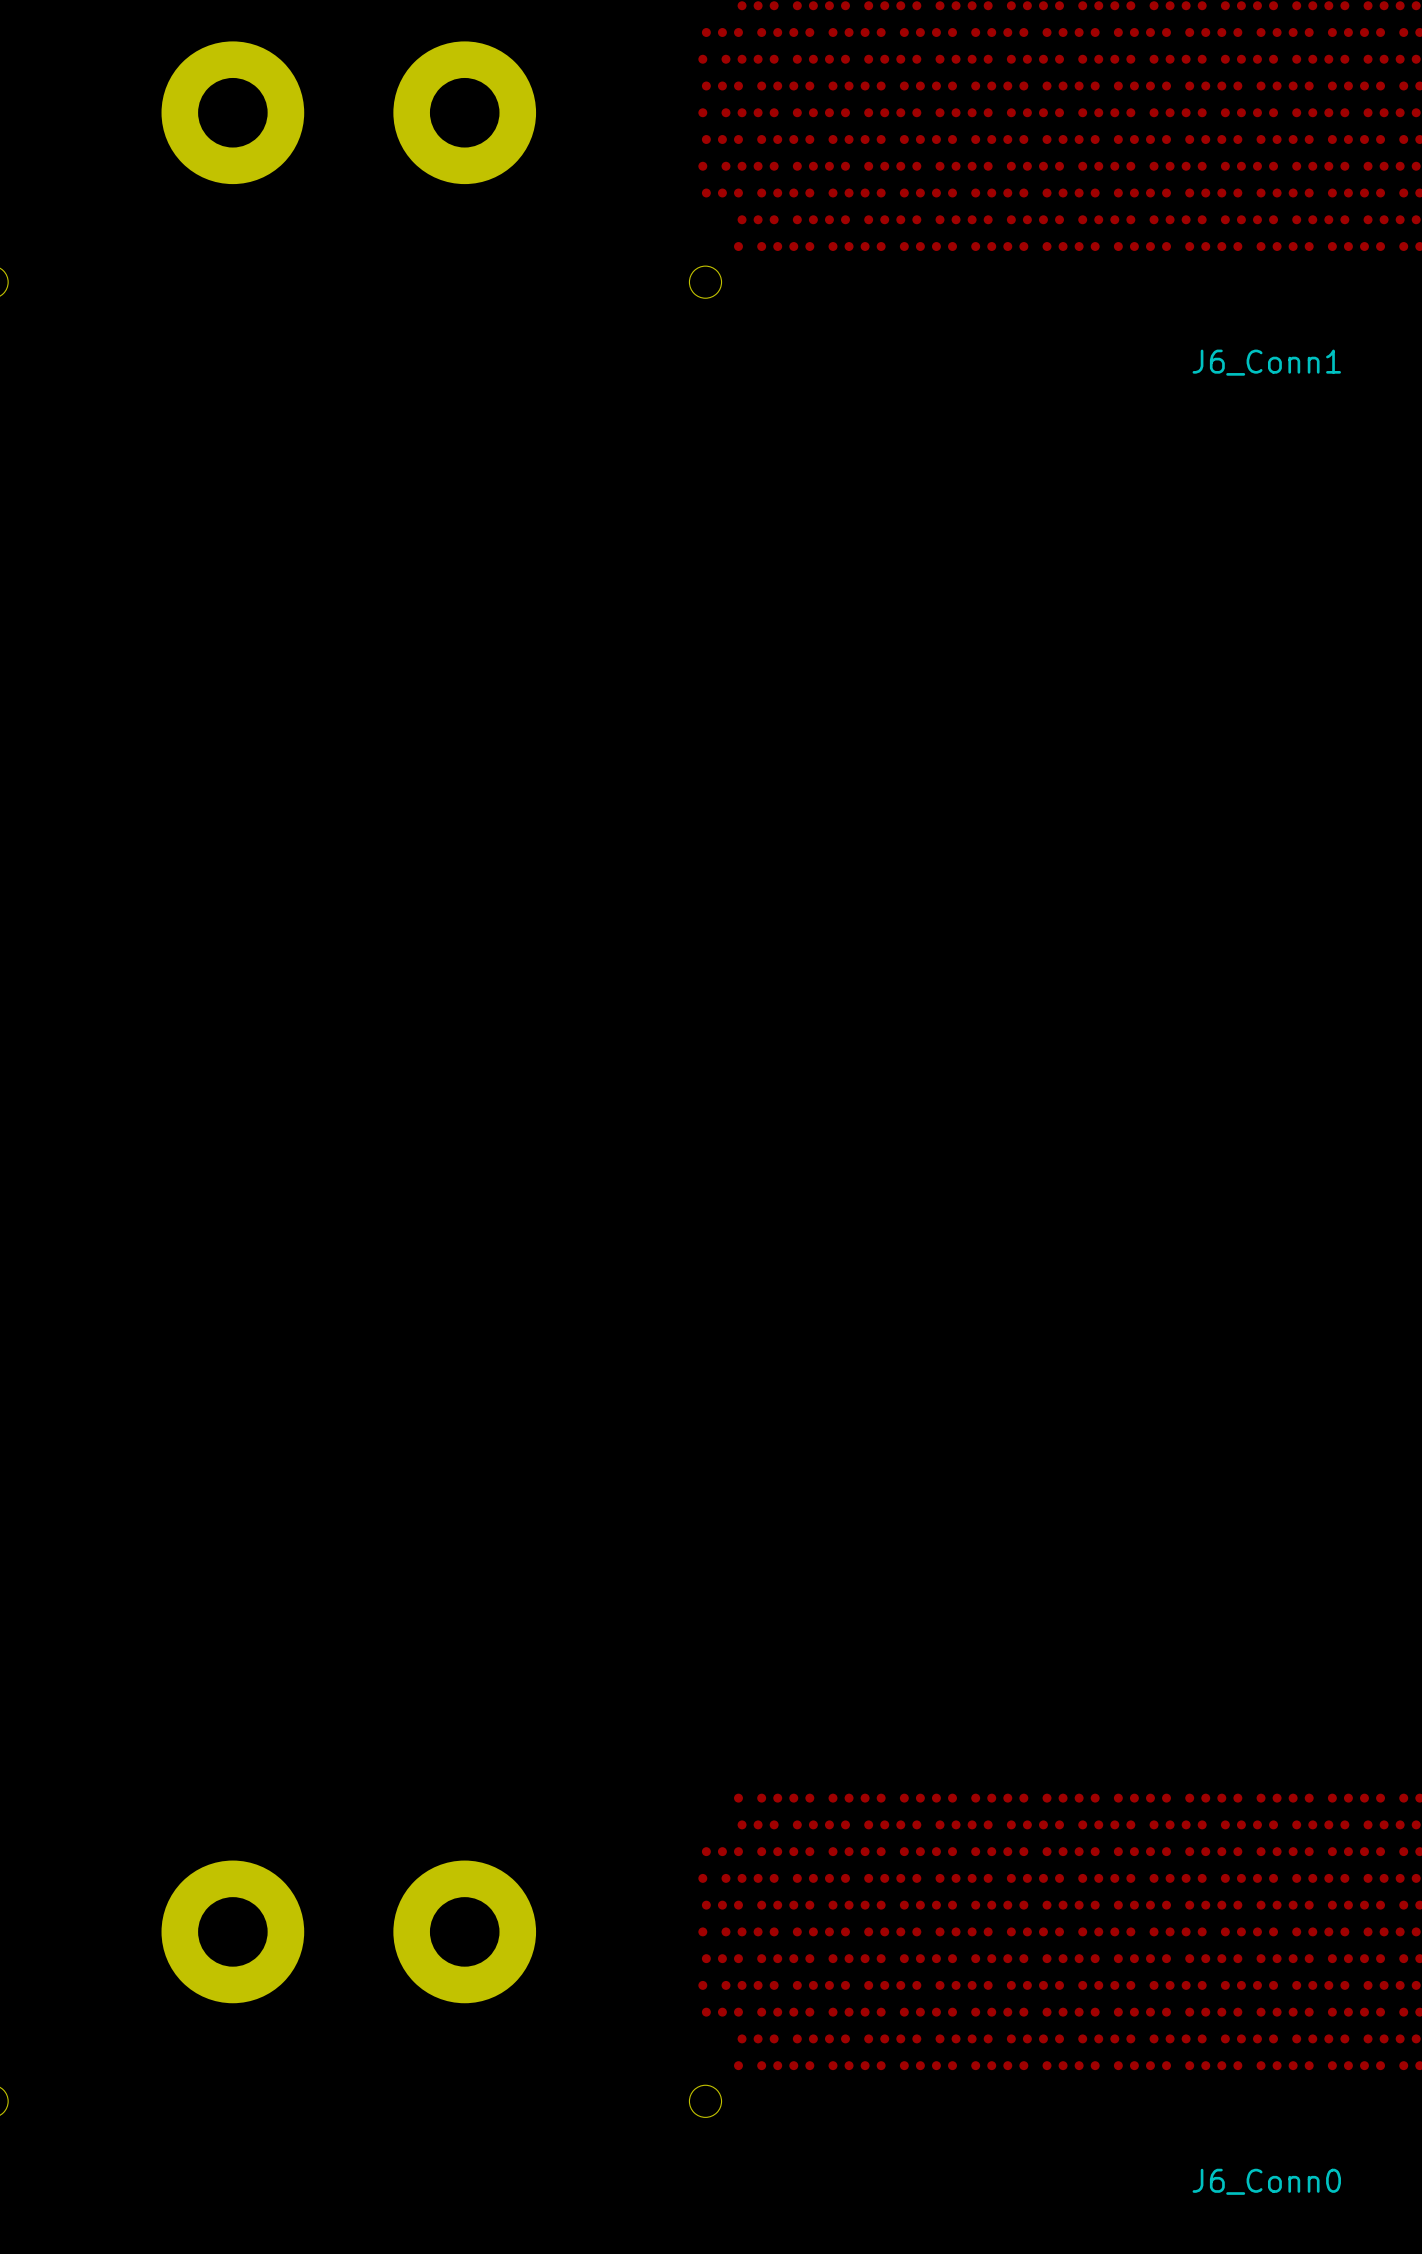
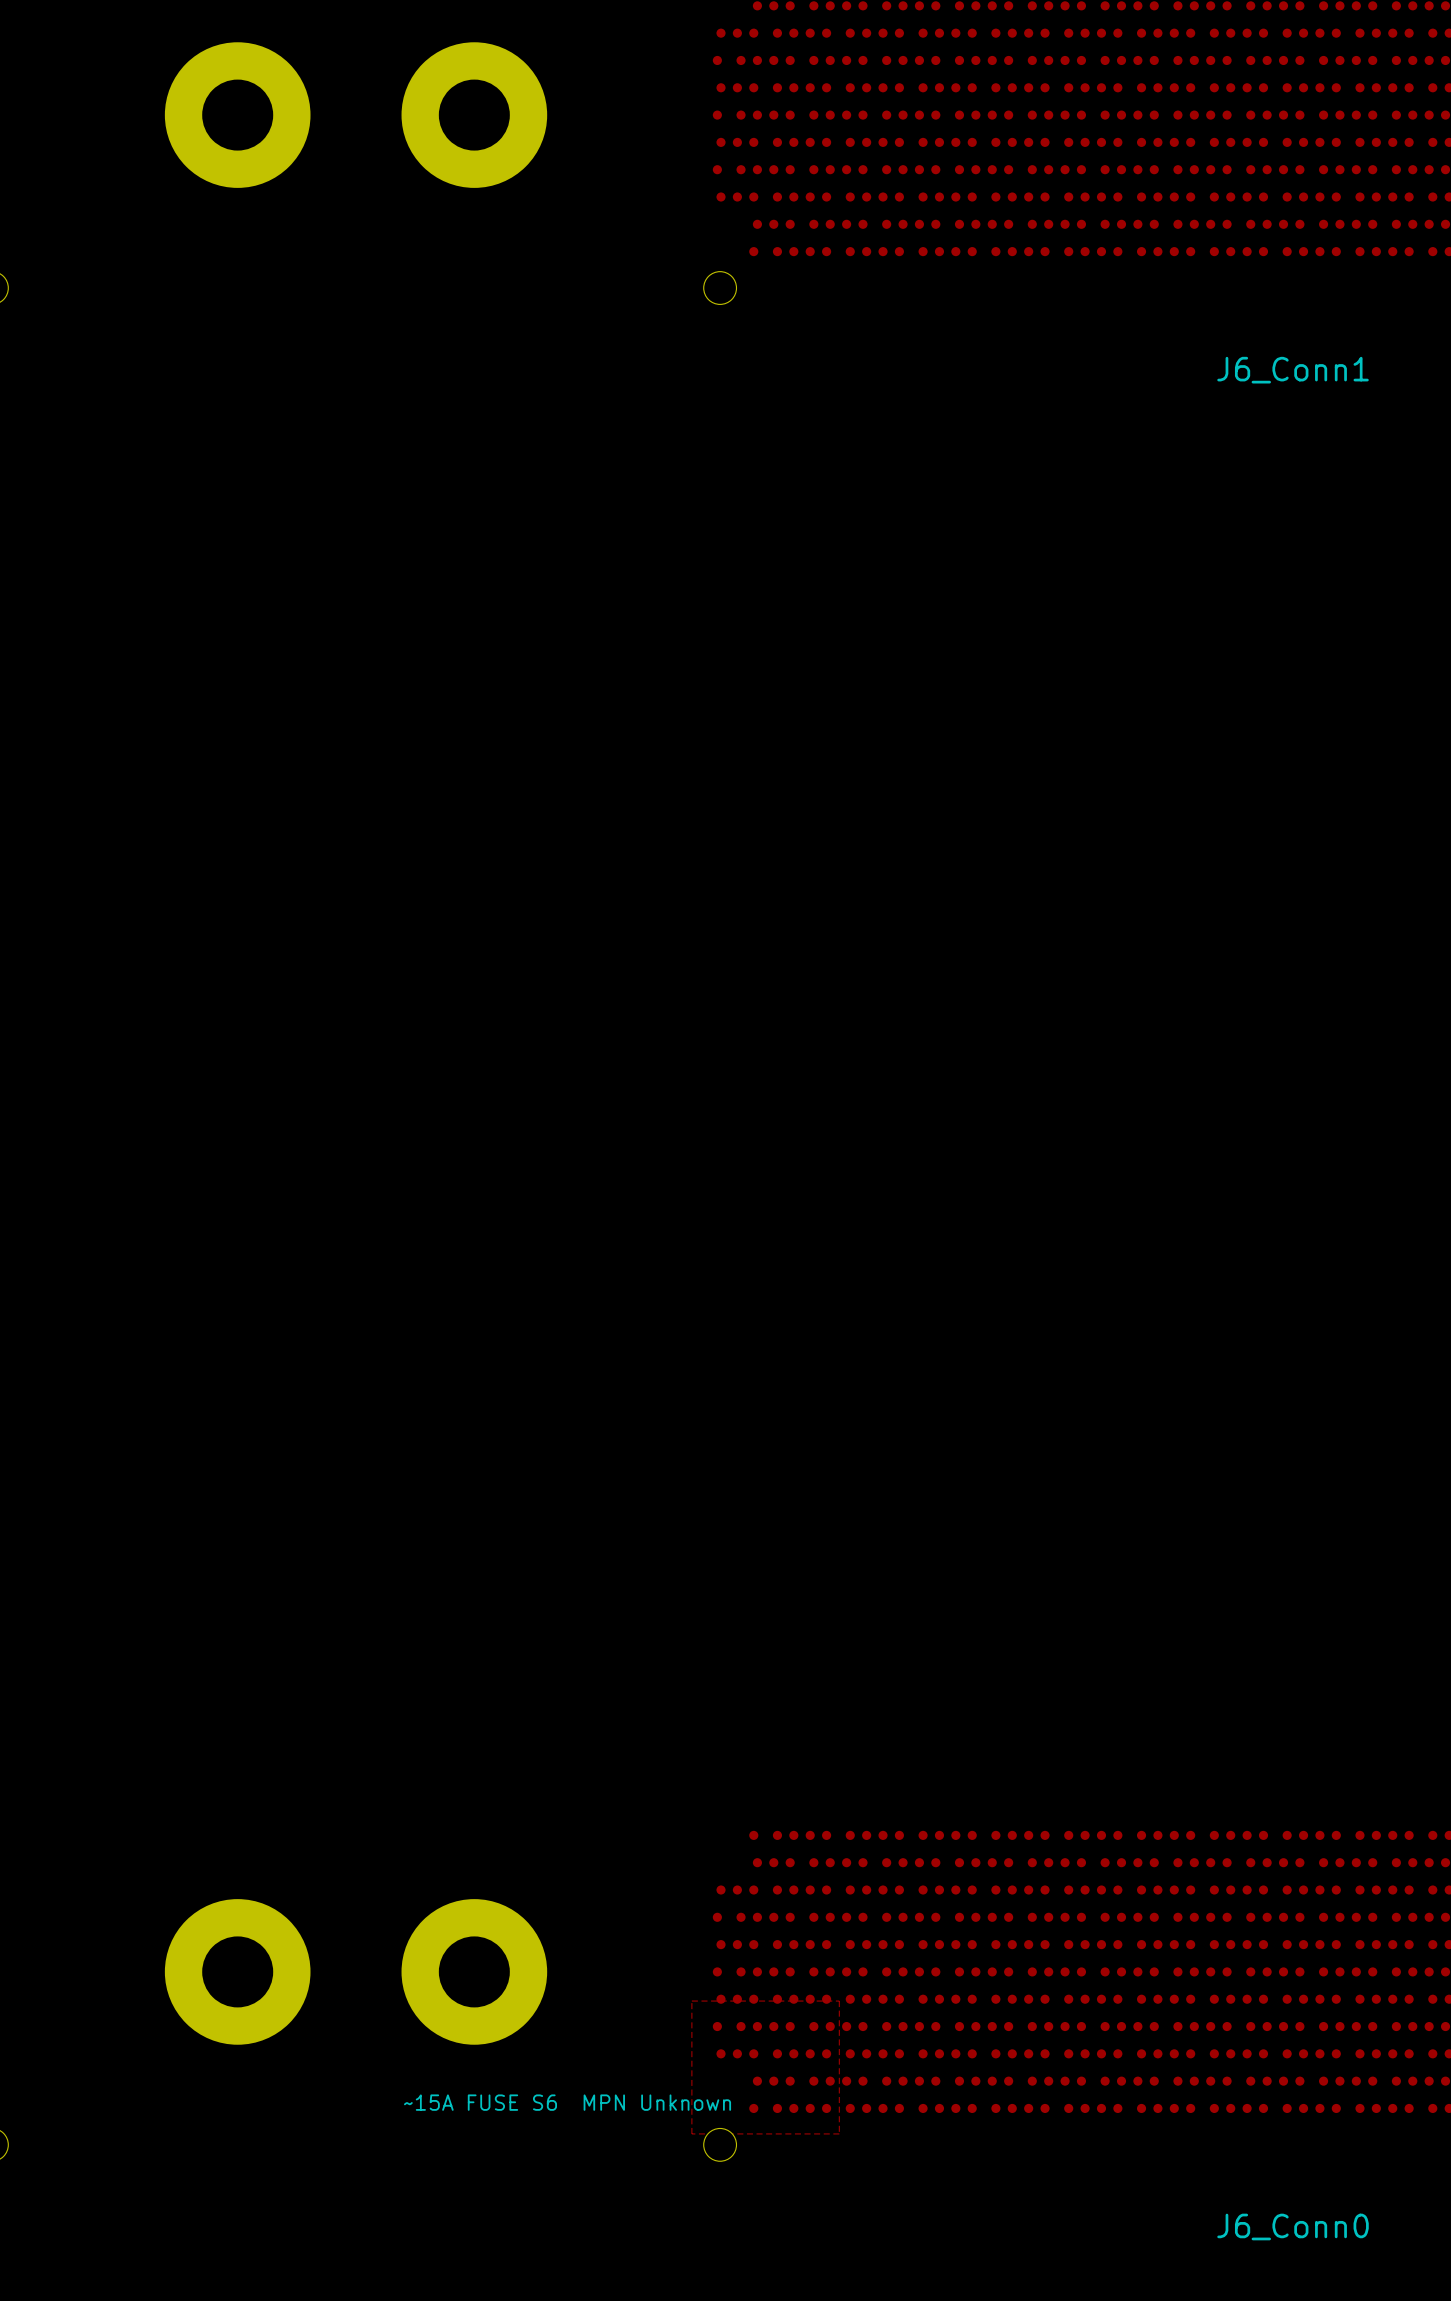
top zone outline: none -> (691, 2001) (839, 2001) (839, 2133) (691, 2133) (691, 2001)
text: none -> ~15A FUSE S6 MPN Unknown (567, 2102)

